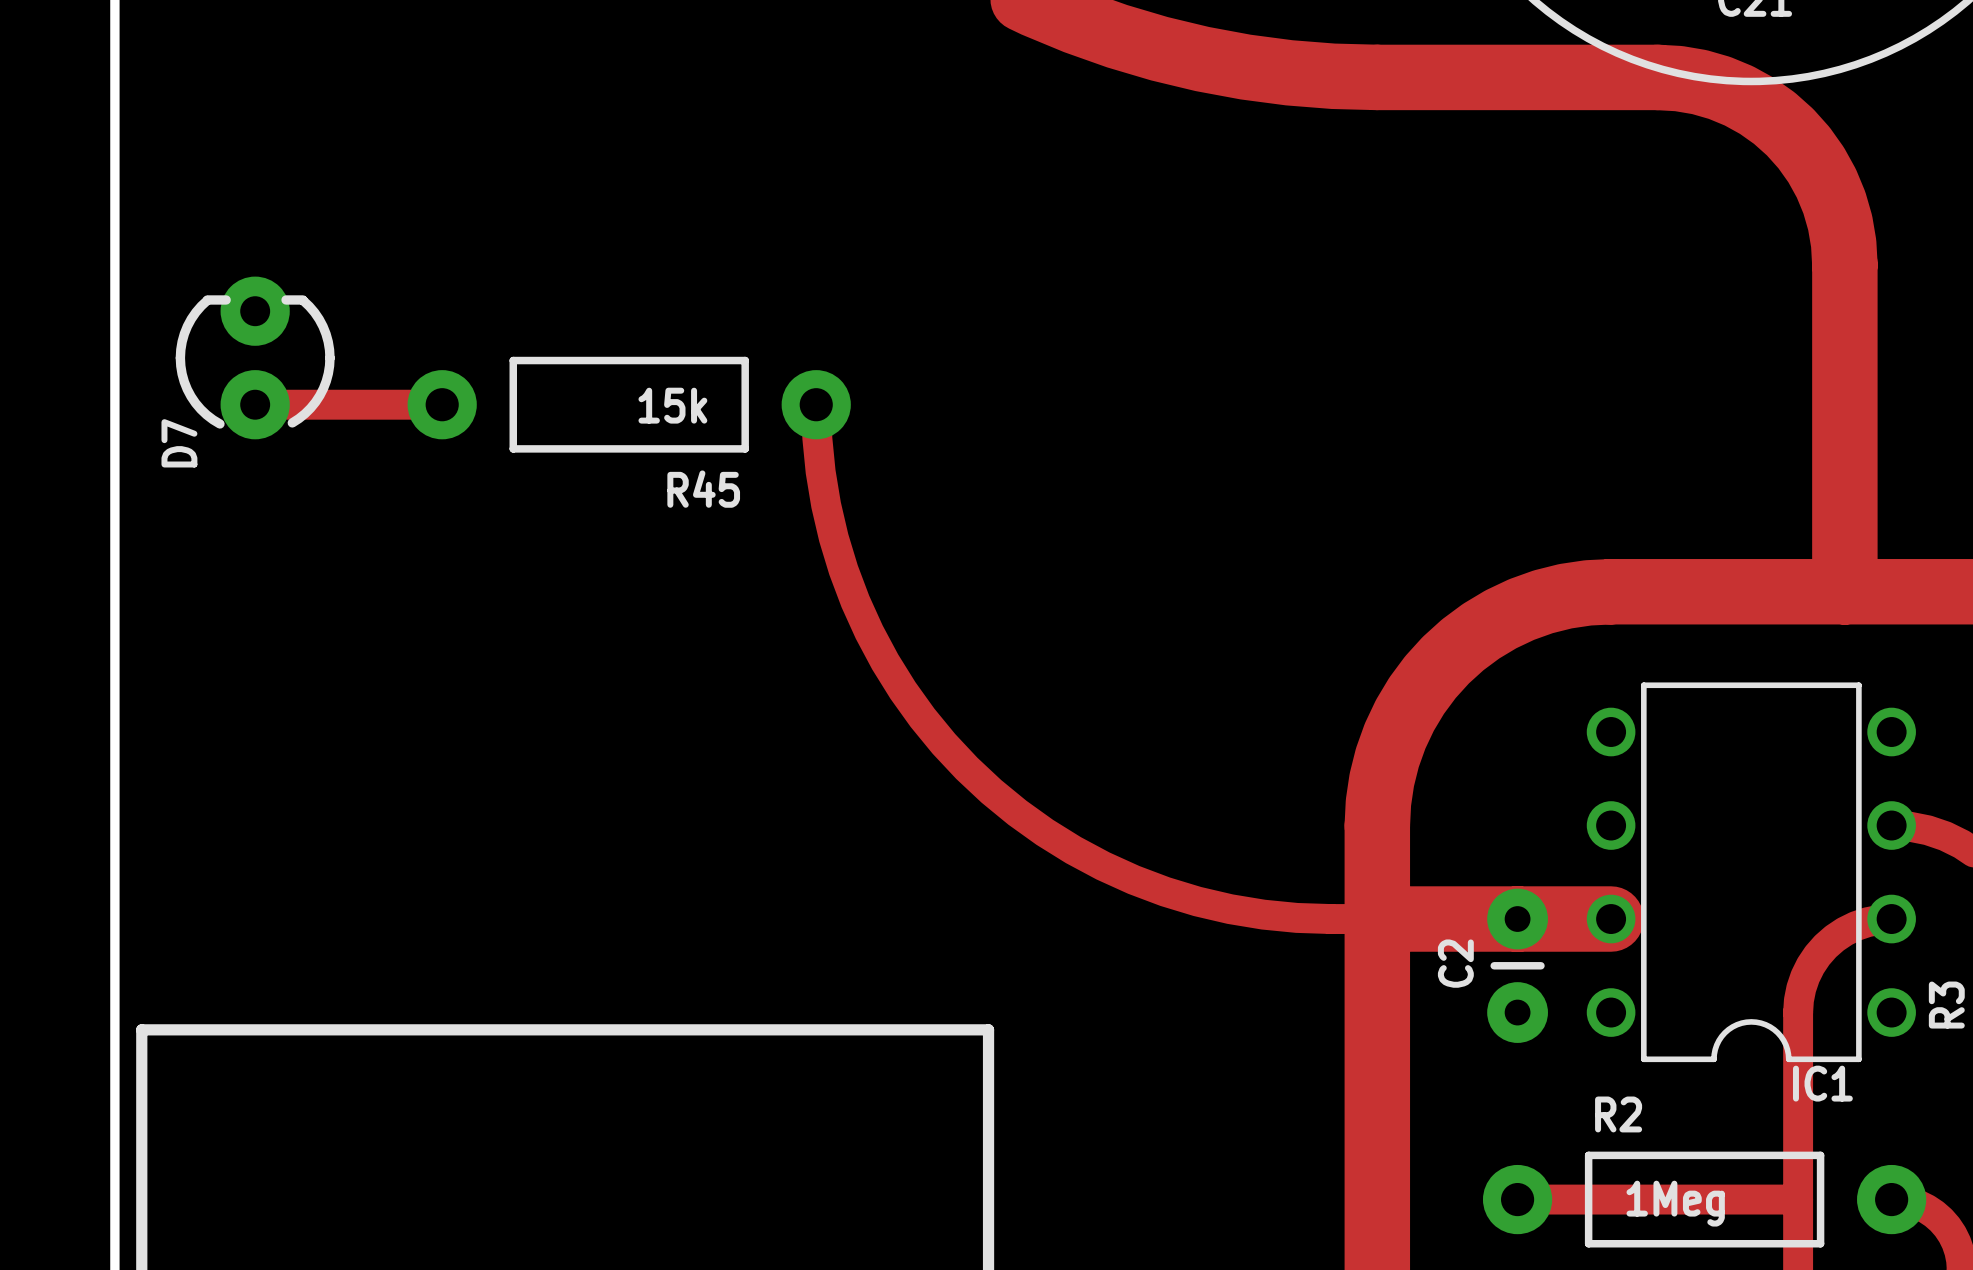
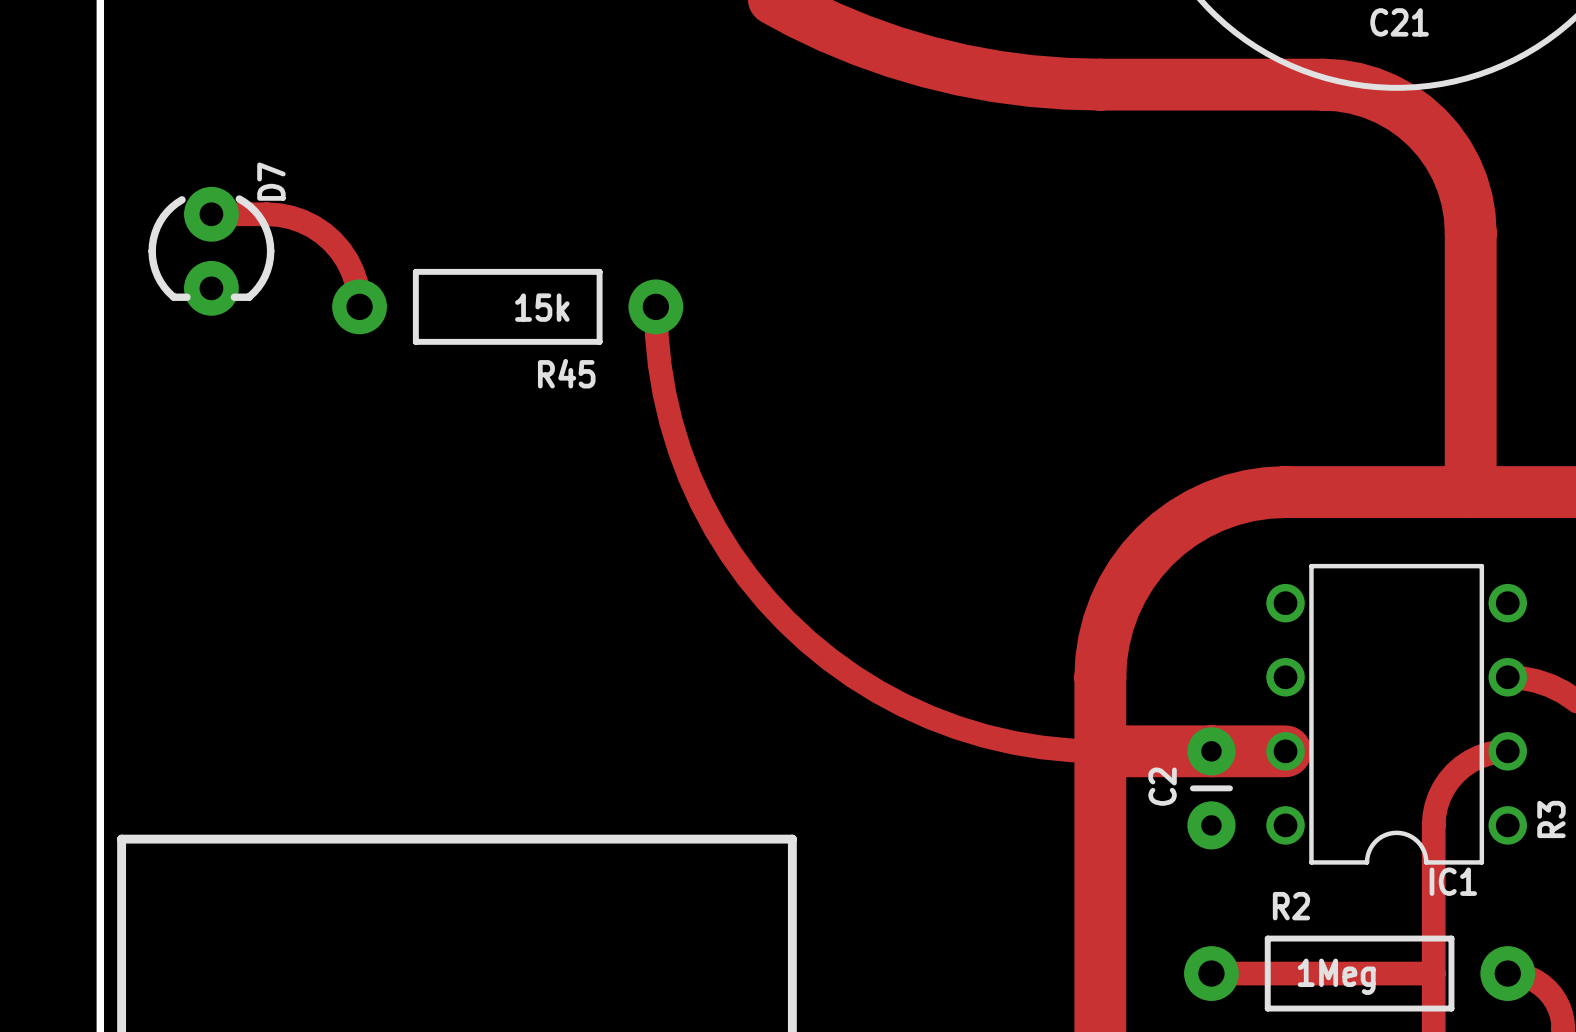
track: none -> (211, 214) (279, 215) (290, 217) (313, 226) (332, 241) (347, 260) (356, 282) (359, 306)
D7 rotation: 0° (255, 357) -> 180° (211, 251)
track: (255, 404) (442, 404) -> none
R45 position: (629, 404) -> (507, 306)
track: (816, 404) (820, 471) (826, 505) (833, 537) (855, 601) (869, 632) (902, 690) (943, 743) (991, 791) (1017, 812) (1073, 850) (1133, 879) (1165, 891) (1230, 909) (1263, 914) (1296, 917) (1377, 919) -> (655, 306) (656, 335) (664, 393) (671, 421) (689, 476) (701, 503) (730, 553) (766, 599) (786, 621) (829, 659) (853, 676) (878, 691) (930, 717) (957, 727) (1013, 742) (1042, 747) (1100, 751)

